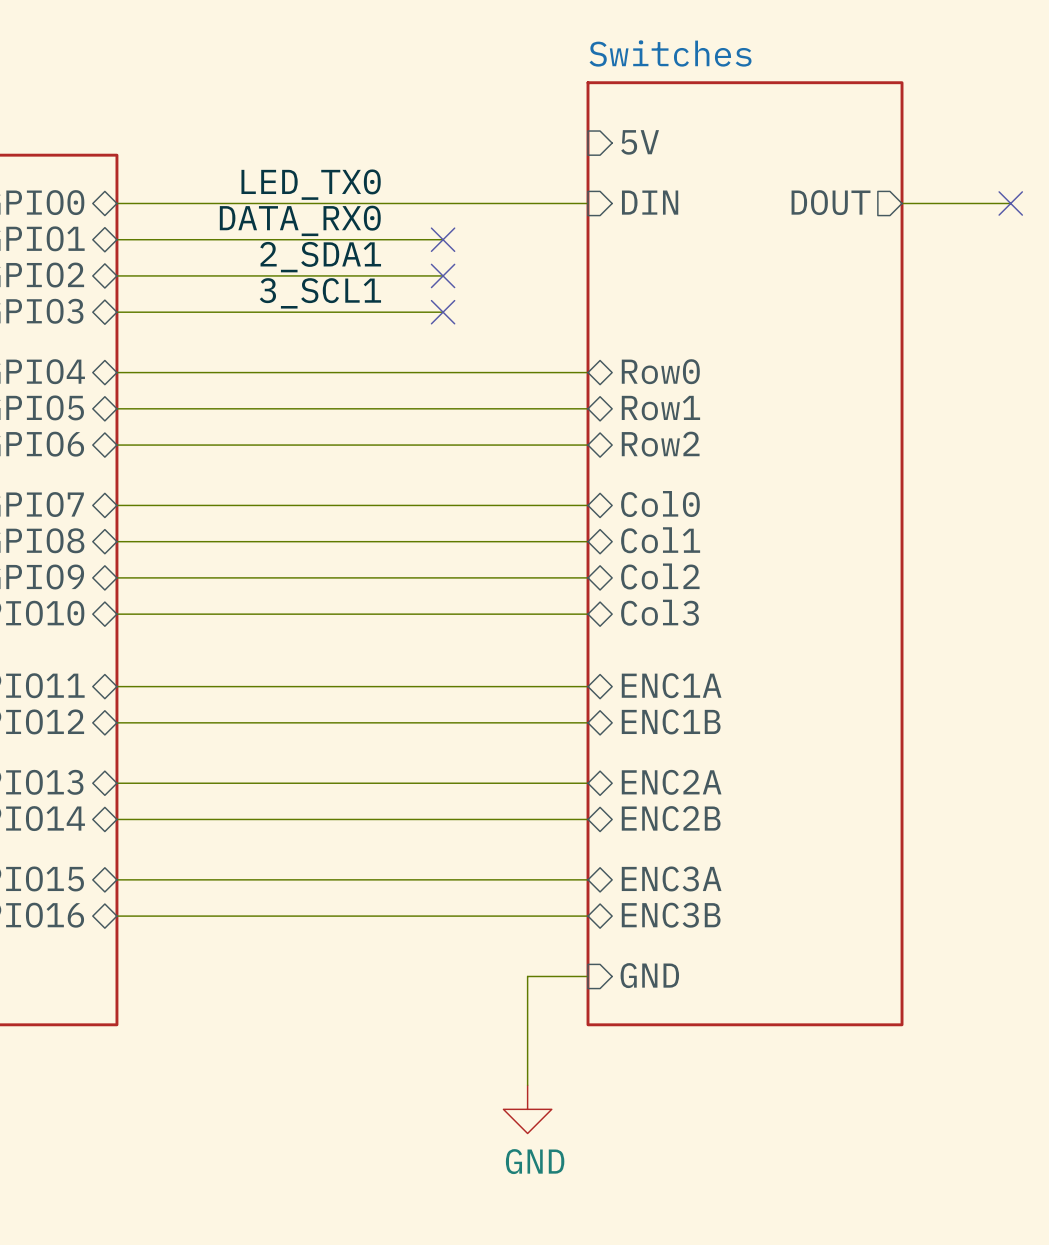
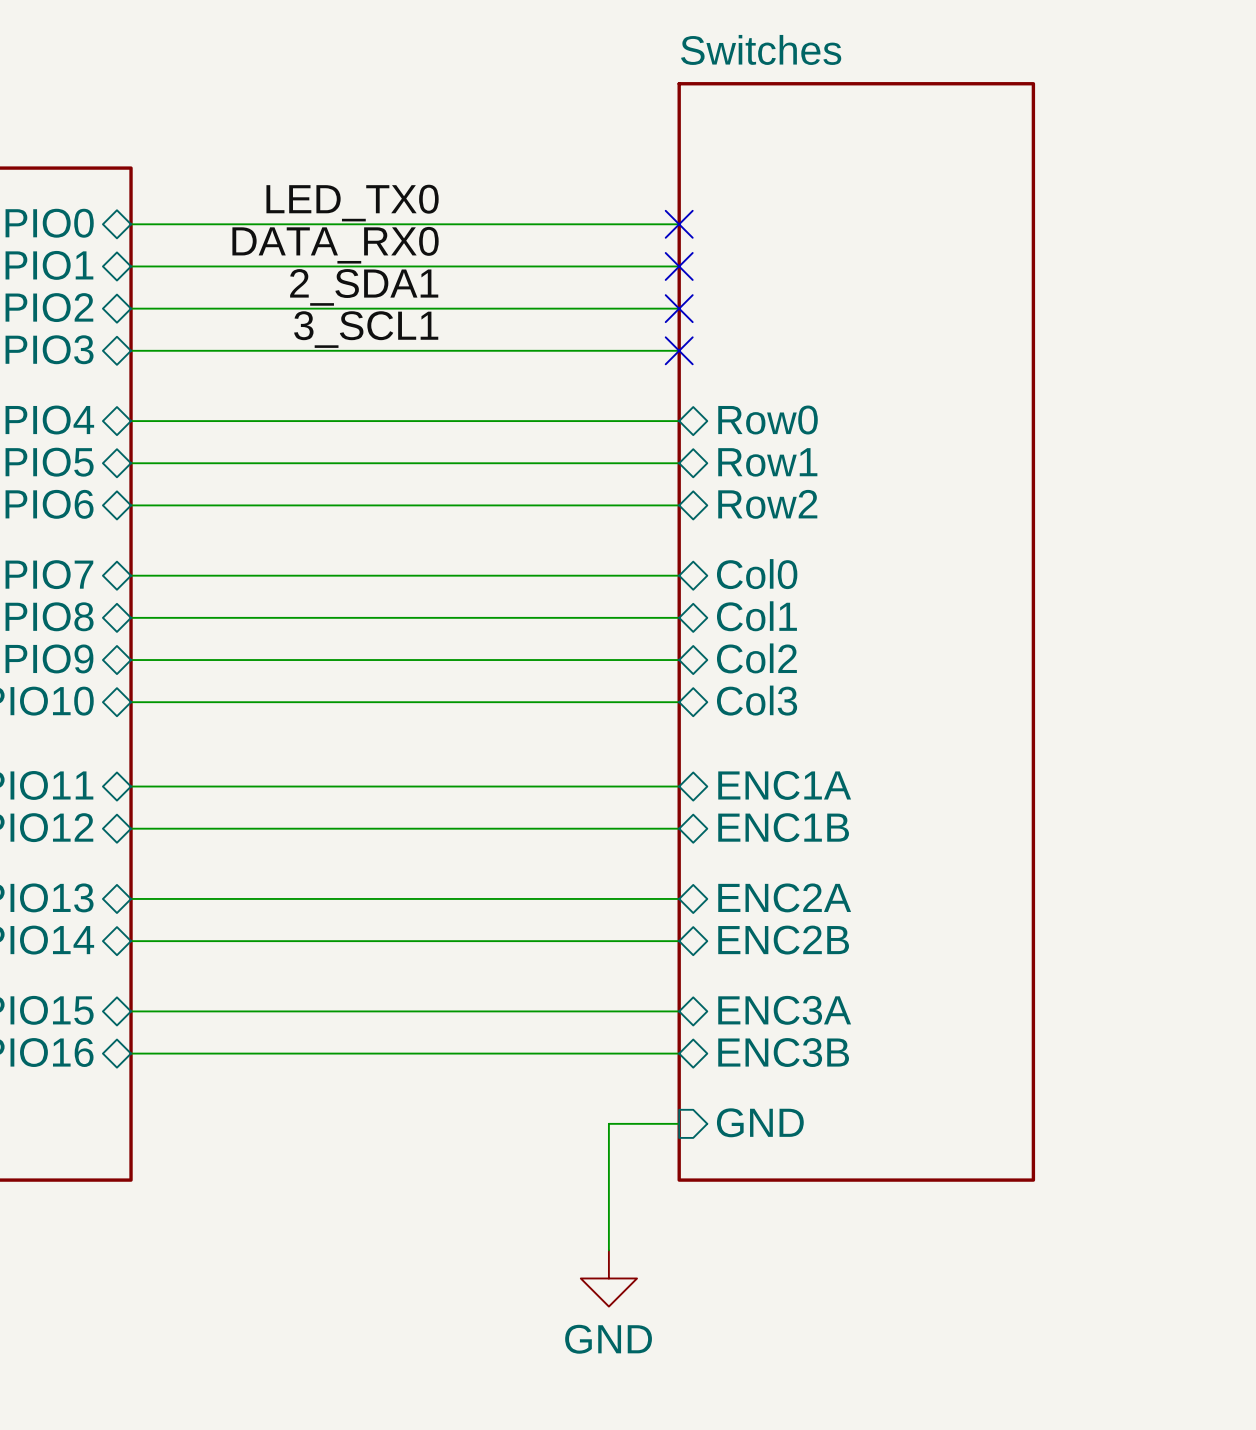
sheet Switches shape: [586, 81, 904, 1027] -> [677, 82, 1036, 1182]
sheet pin: 5V (640, 142) -> none
sheet pin: DIN (650, 202) -> none
sheet pin: DOUT (831, 202) -> none
no-connect mark: none -> (679, 224)
wire: (902, 203) (1010, 203) -> none
no-connect mark: (1010, 203) -> none
wire: none -> (510, 266) (679, 266)
no-connect mark: (443, 239) -> none
no-connect mark: none -> (679, 266)
wire: none -> (510, 308) (679, 308)
no-connect mark: (443, 275) -> none
no-connect mark: none -> (679, 308)
wire: none -> (510, 350) (679, 350)
no-connect mark: (443, 312) -> none
no-connect mark: none -> (679, 350)

